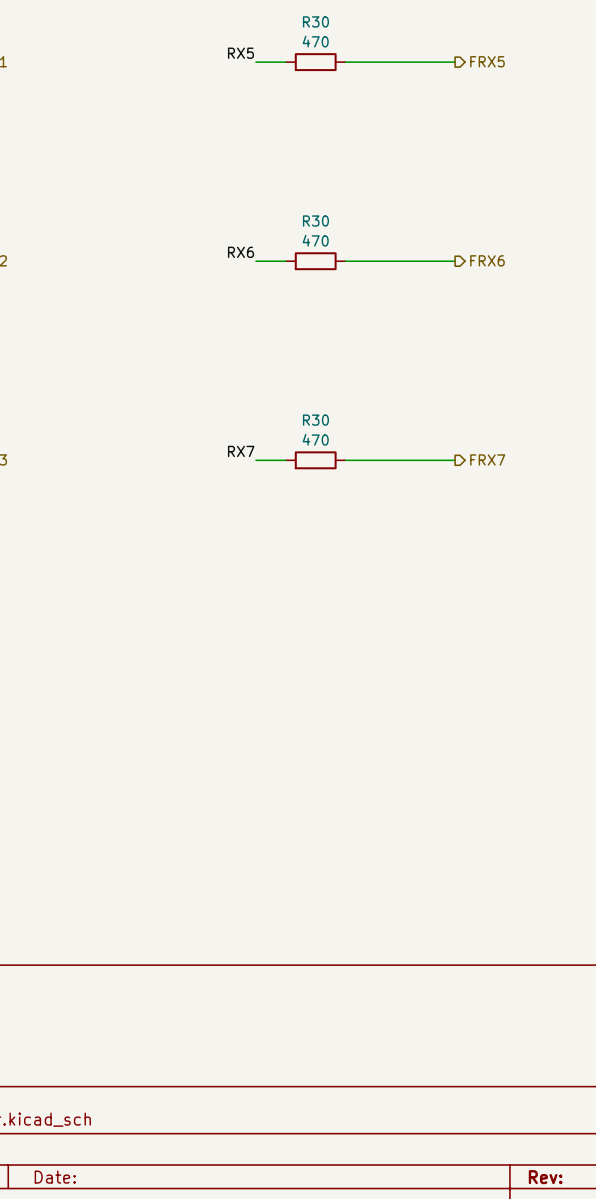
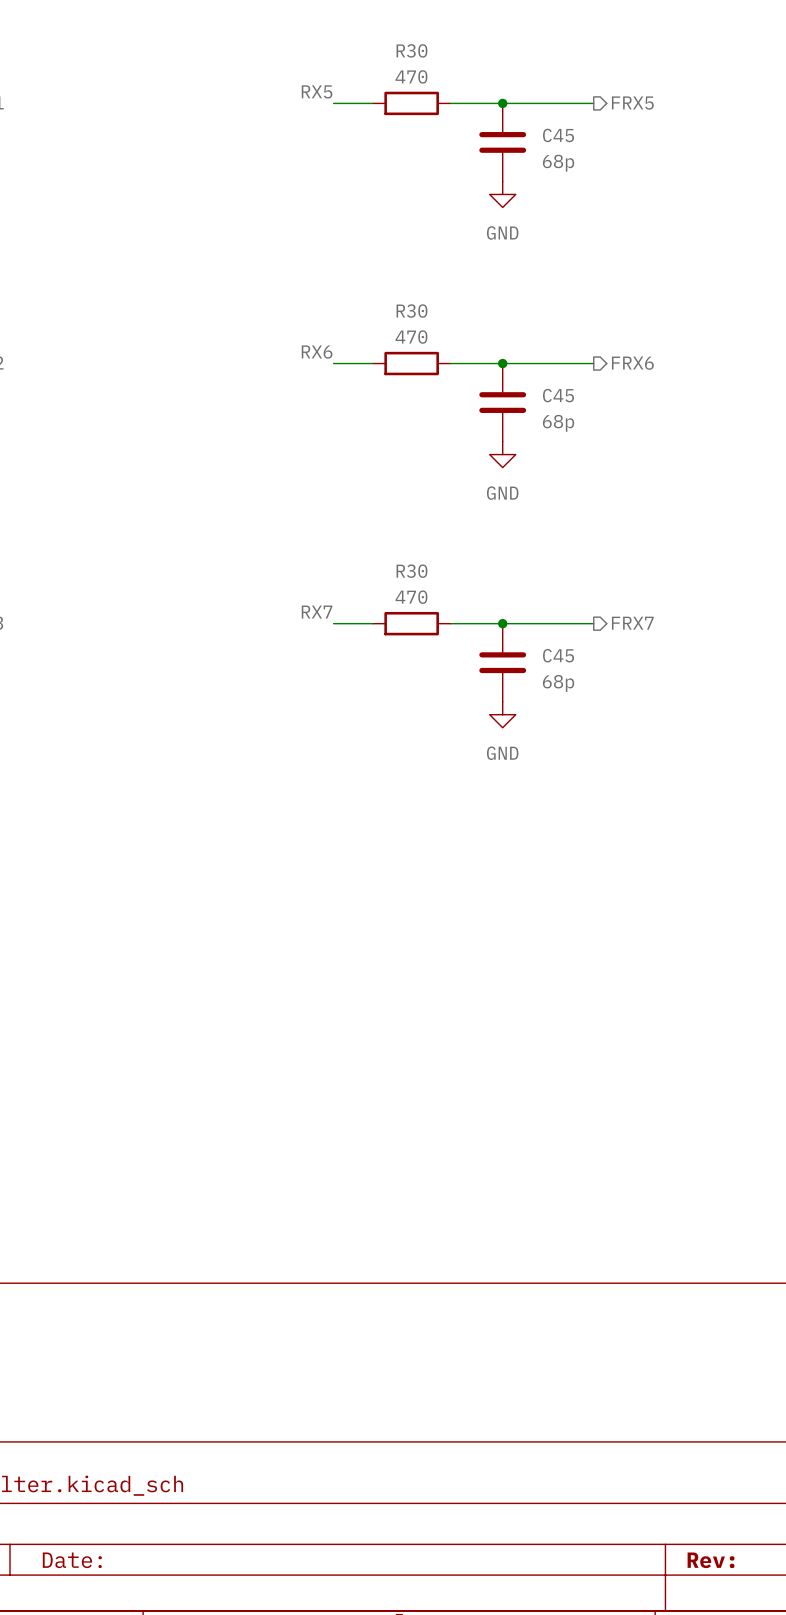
junction: none -> (502, 103)
C45: none -> 68p (502, 142)
power symbol: none -> GND (502, 194)
junction: none -> (502, 363)
C45: none -> 68p (502, 402)
power symbol: none -> GND (502, 454)
junction: none -> (502, 623)
C45: none -> 68p (502, 662)
power symbol: none -> GND (502, 714)

